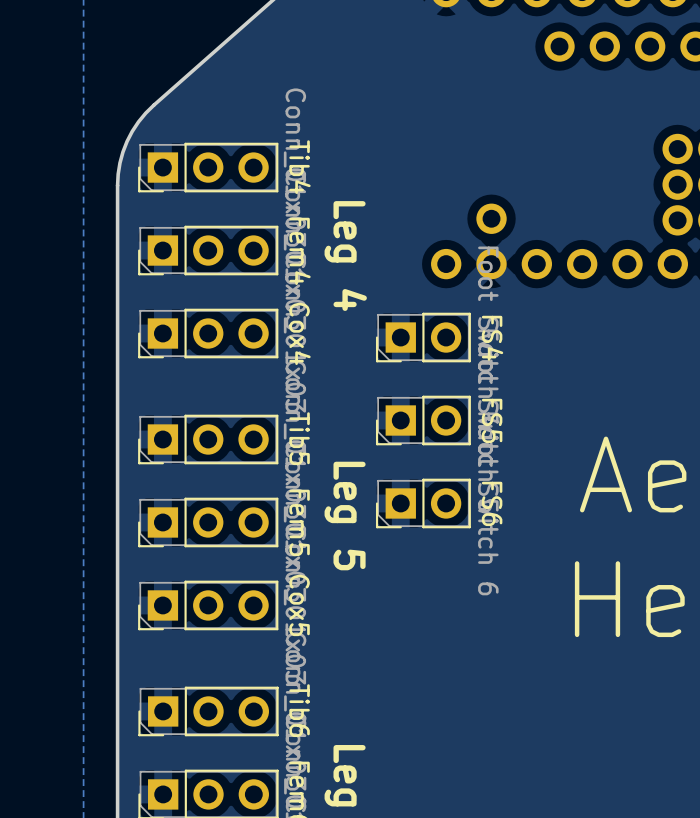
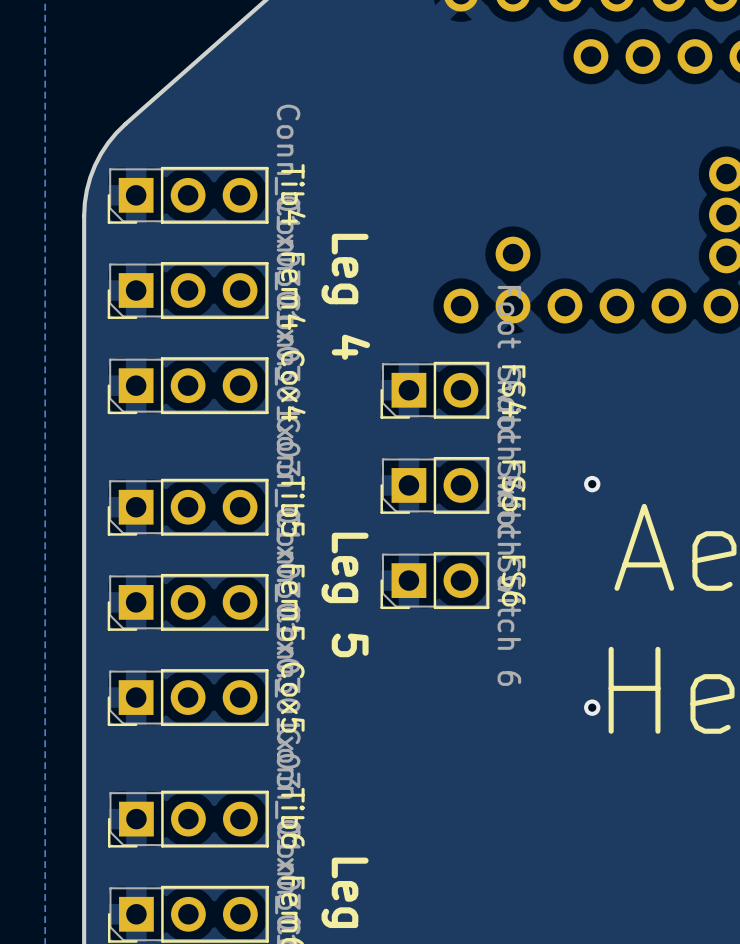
via: none -> (592, 484)
via: none -> (592, 707)

